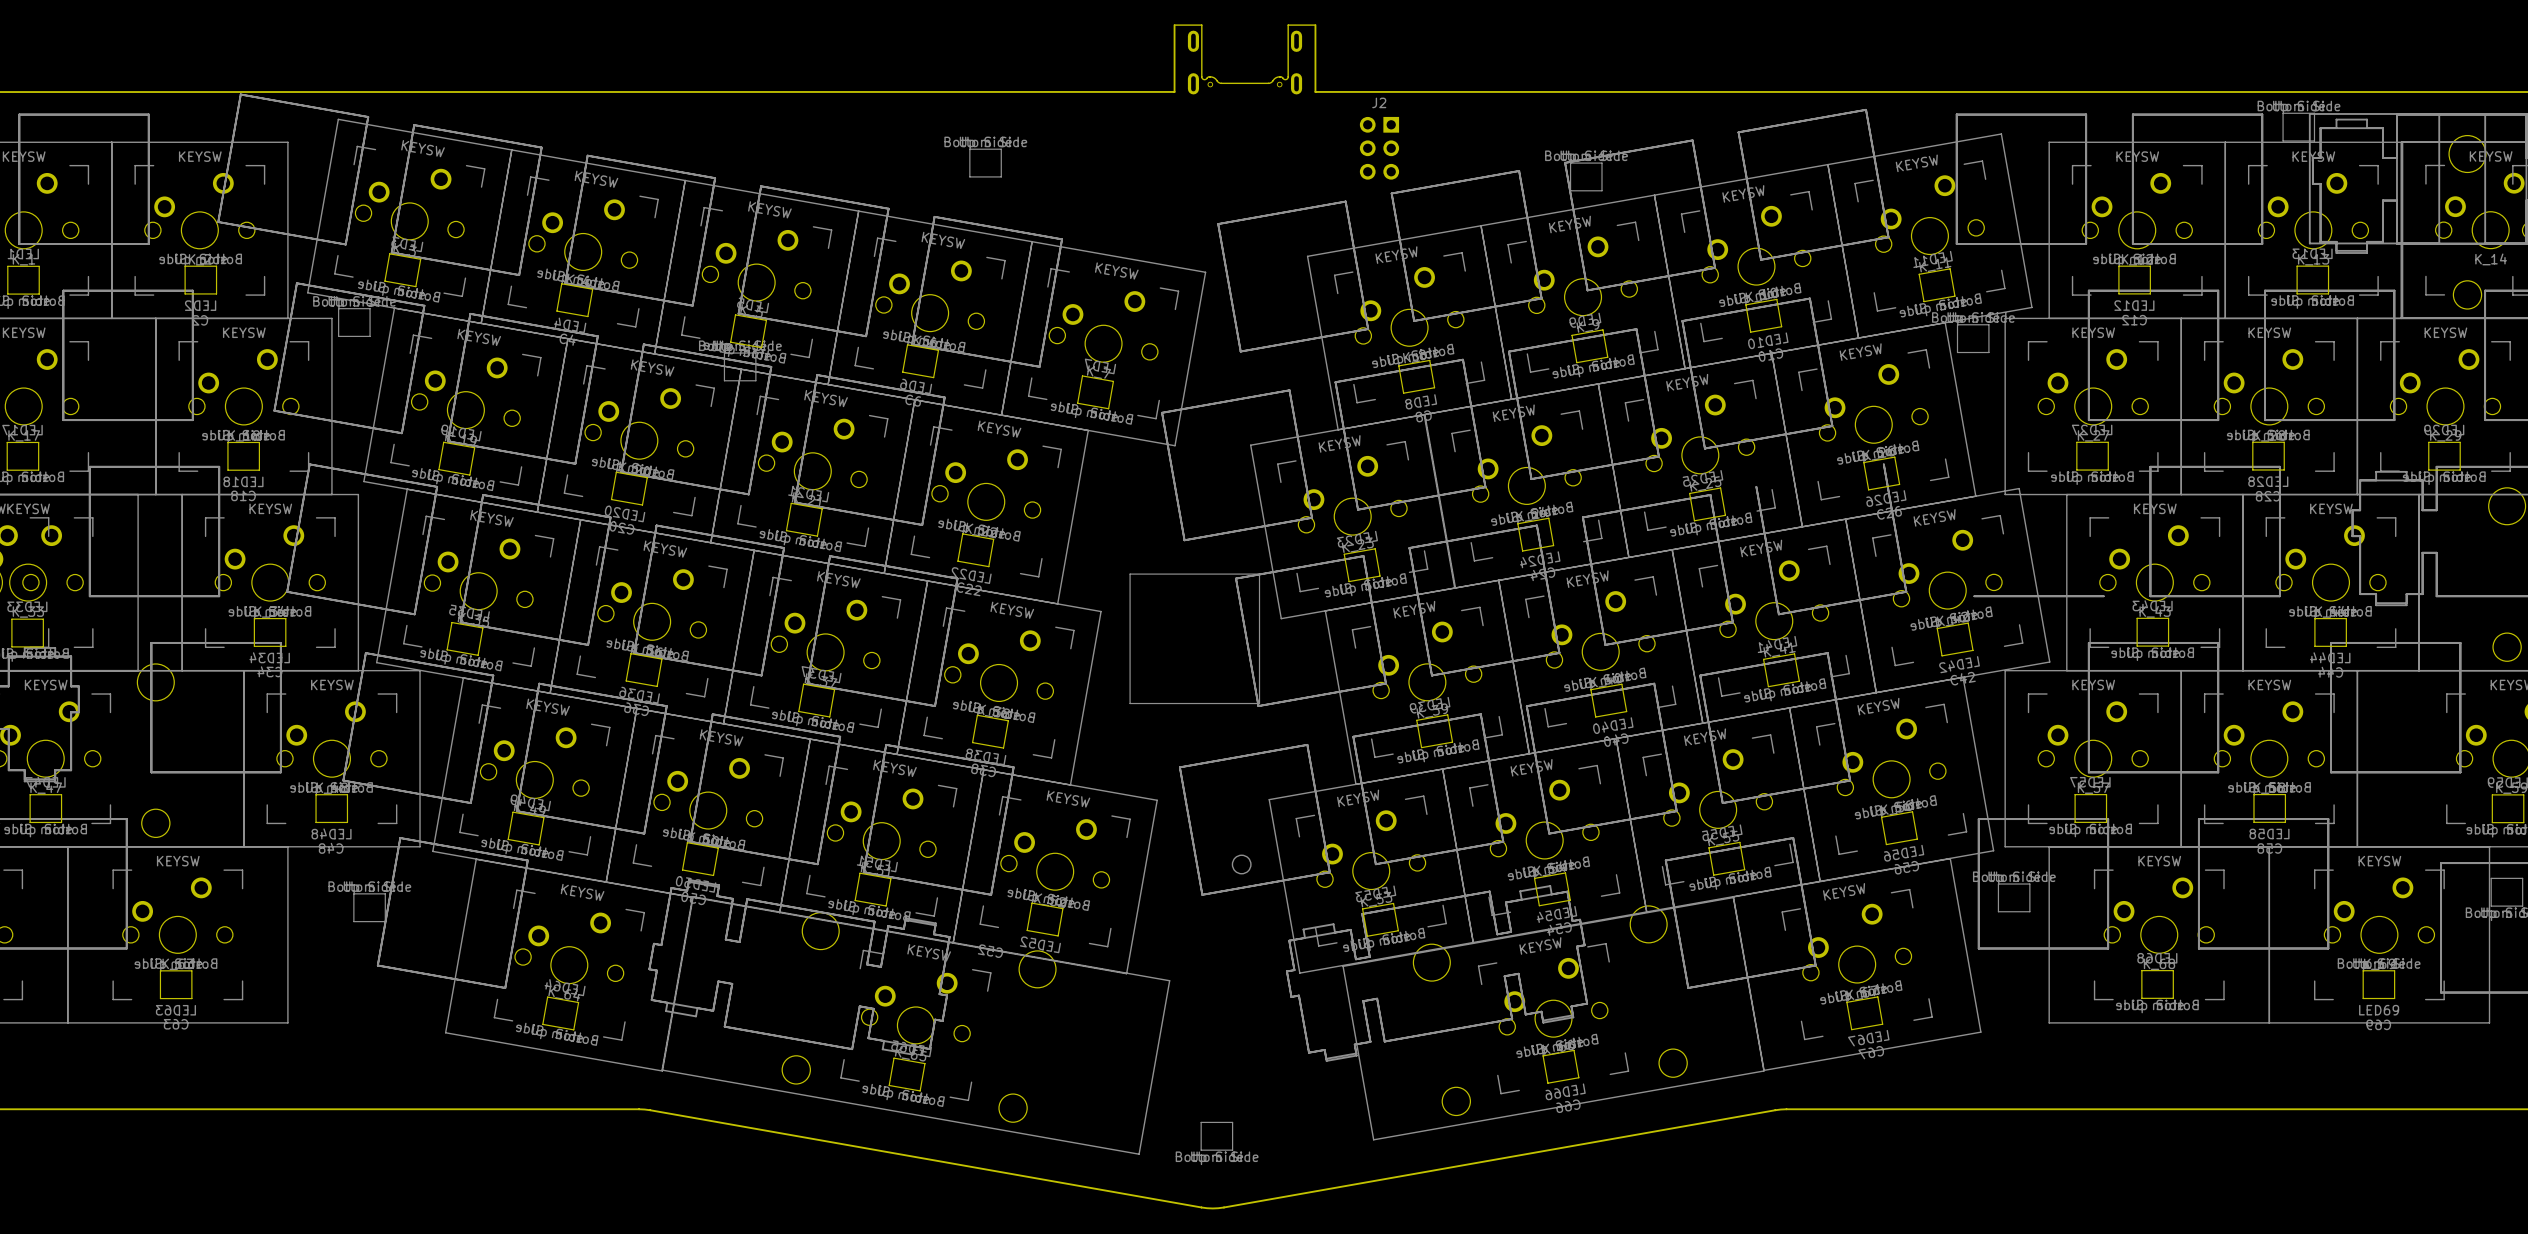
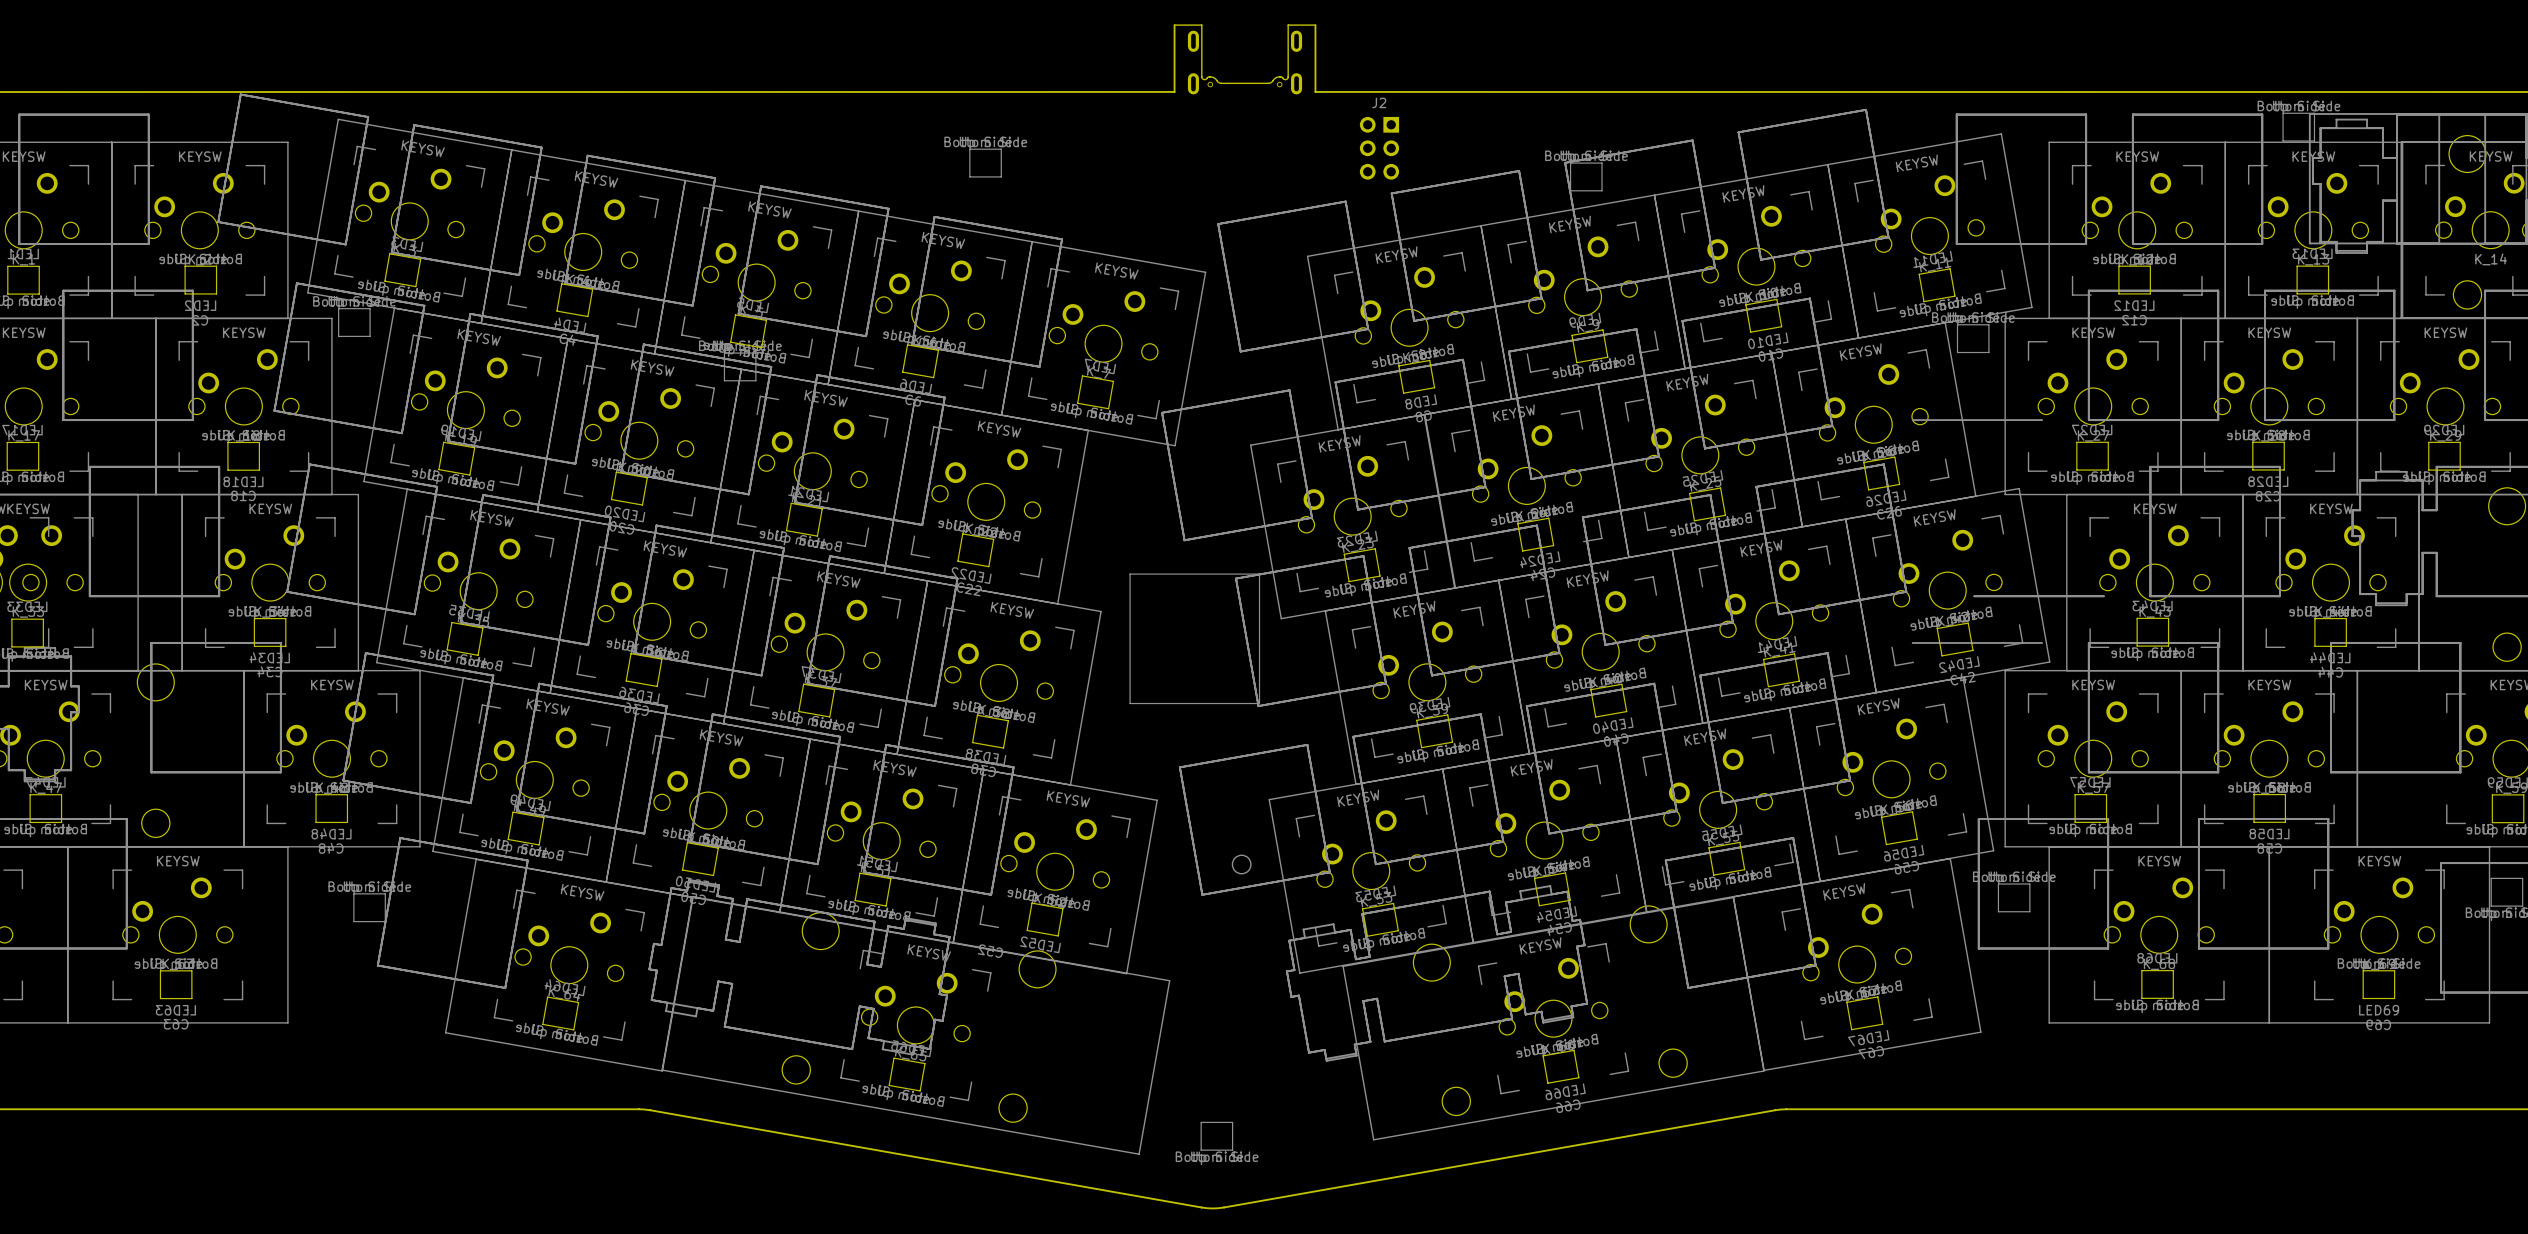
line: none -> (1912, 420) (2042, 420)
line: none -> (1756, 486) (1883, 464) (1756, 486)
line: none -> (1912, 642) (2042, 642)

